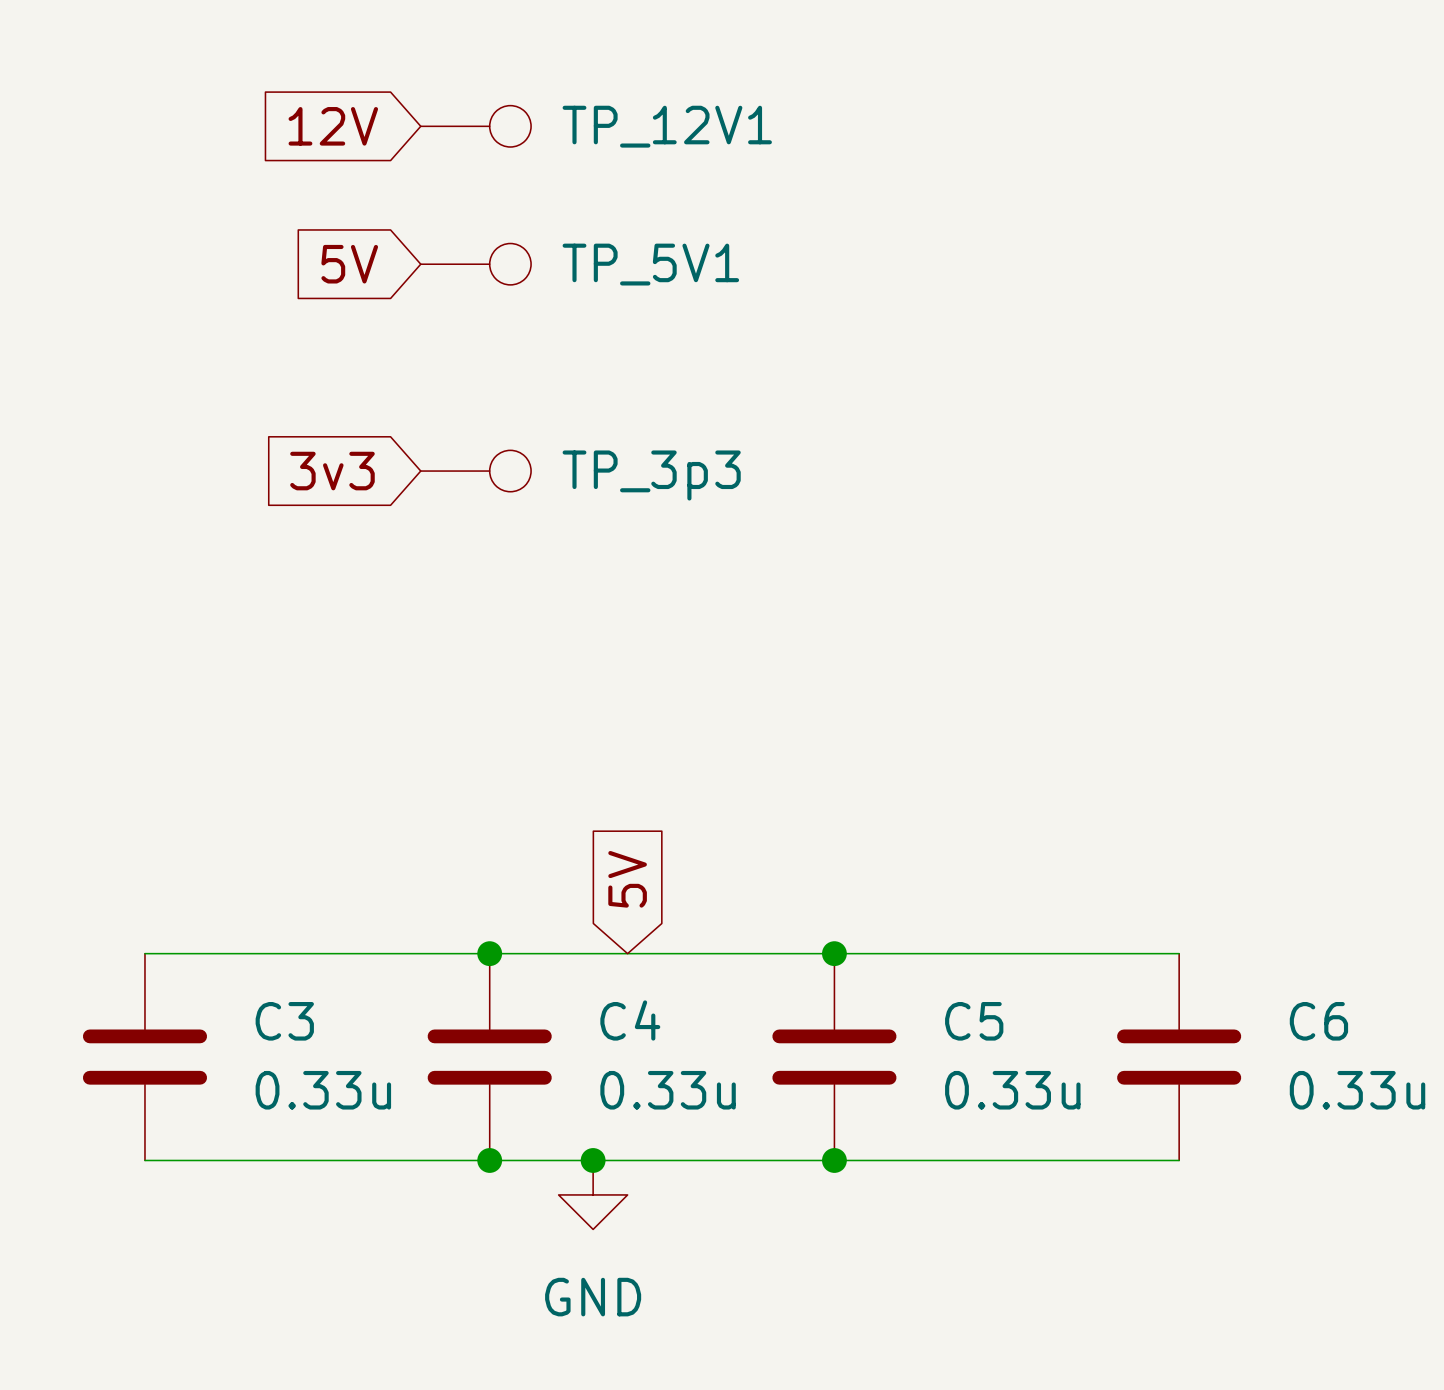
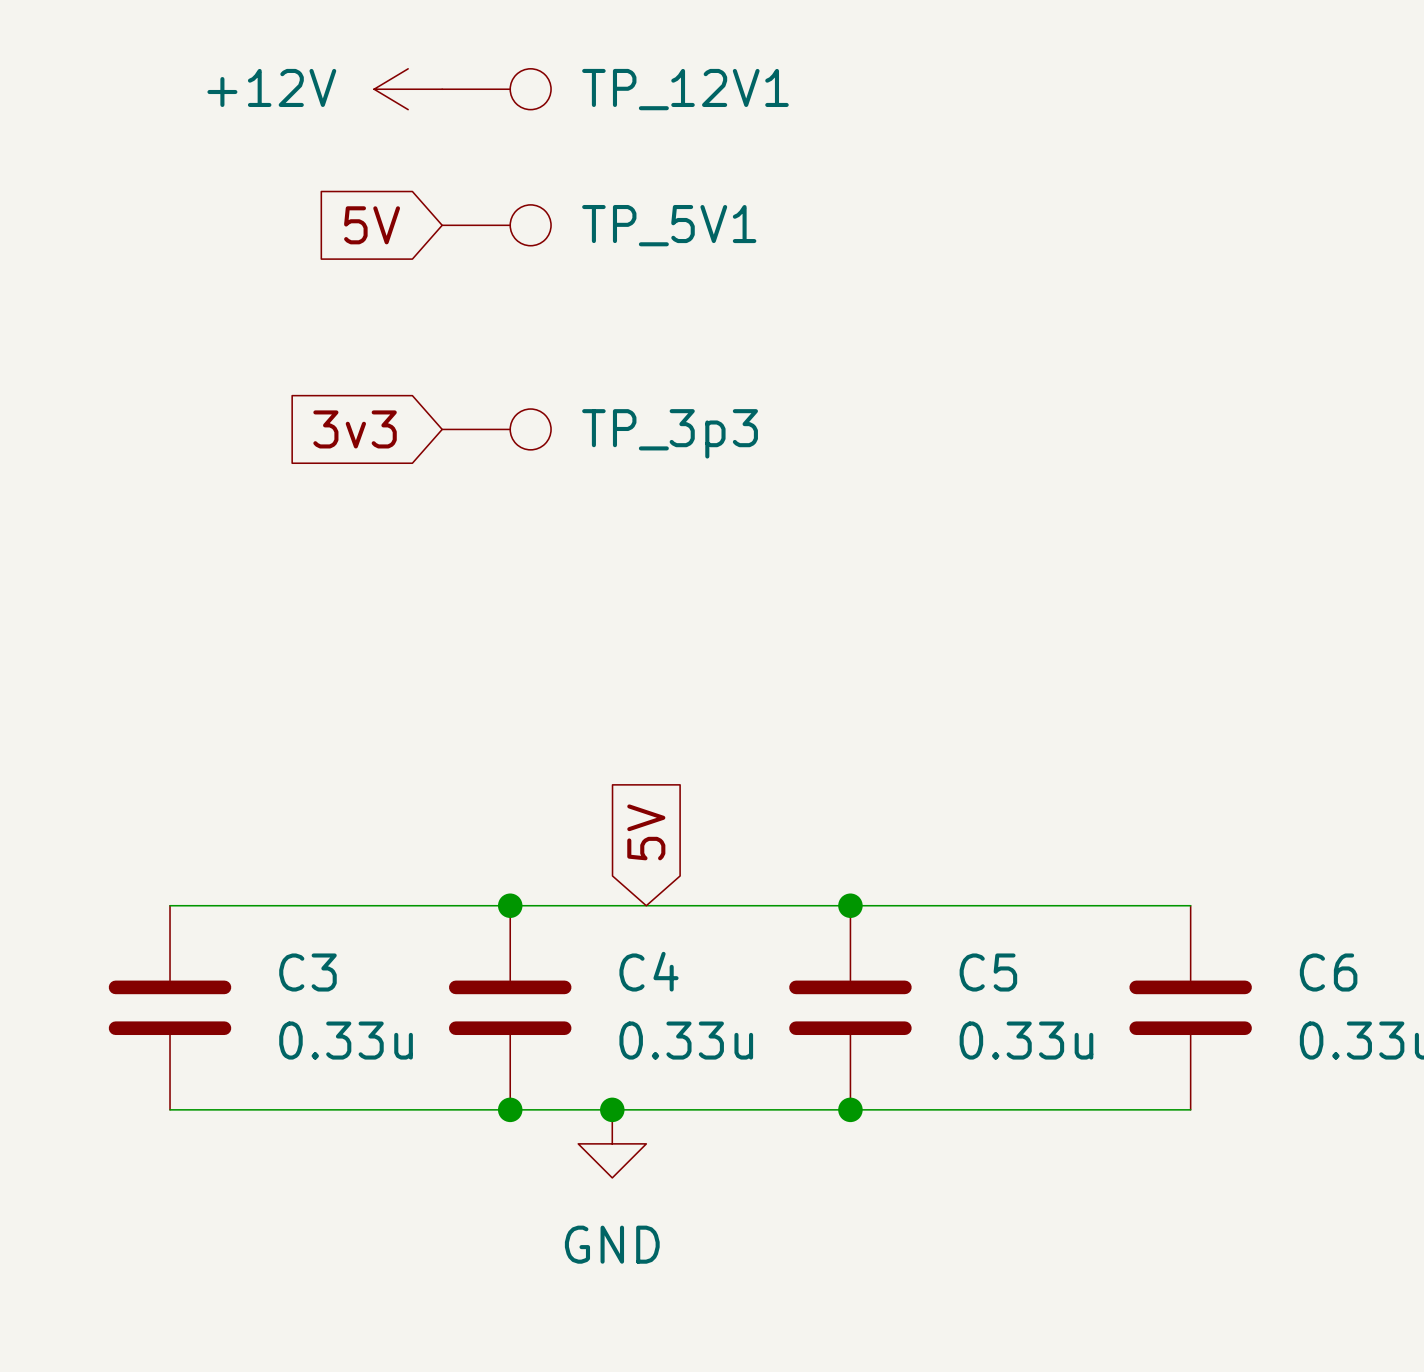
global label: 12V (333, 126) -> none
power symbol: none -> +12V (408, 89)

